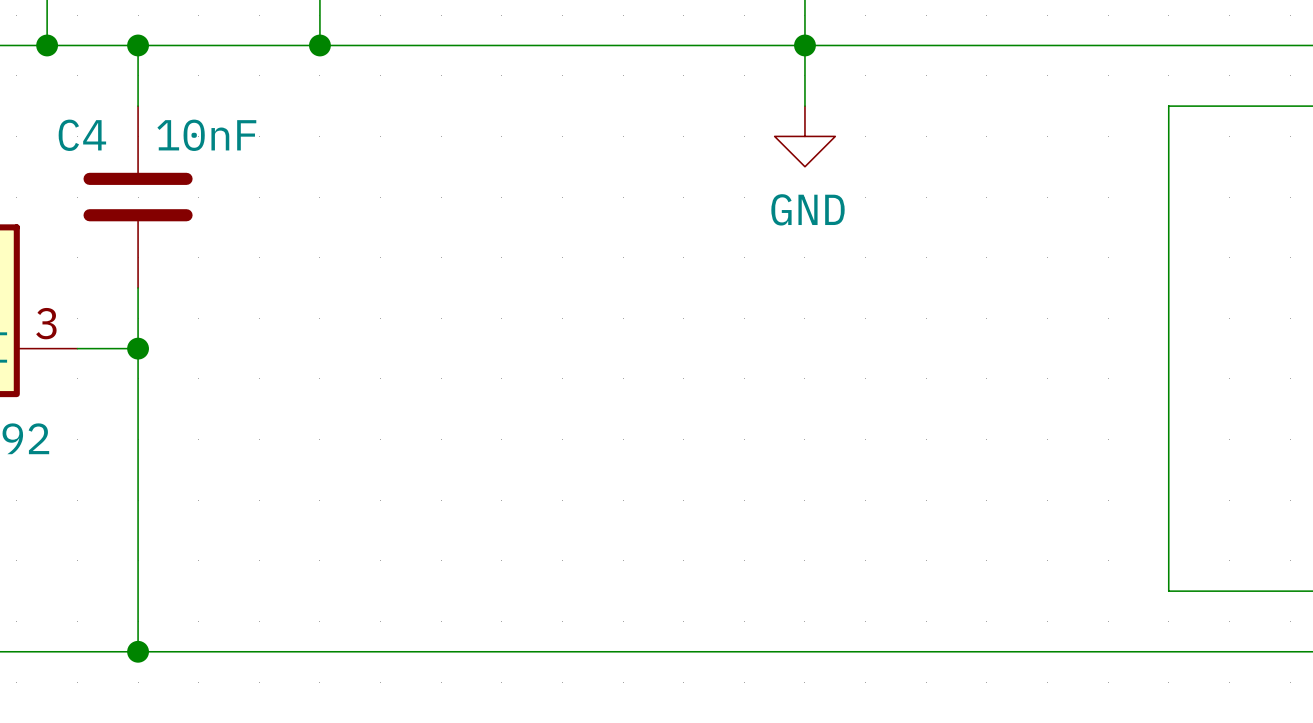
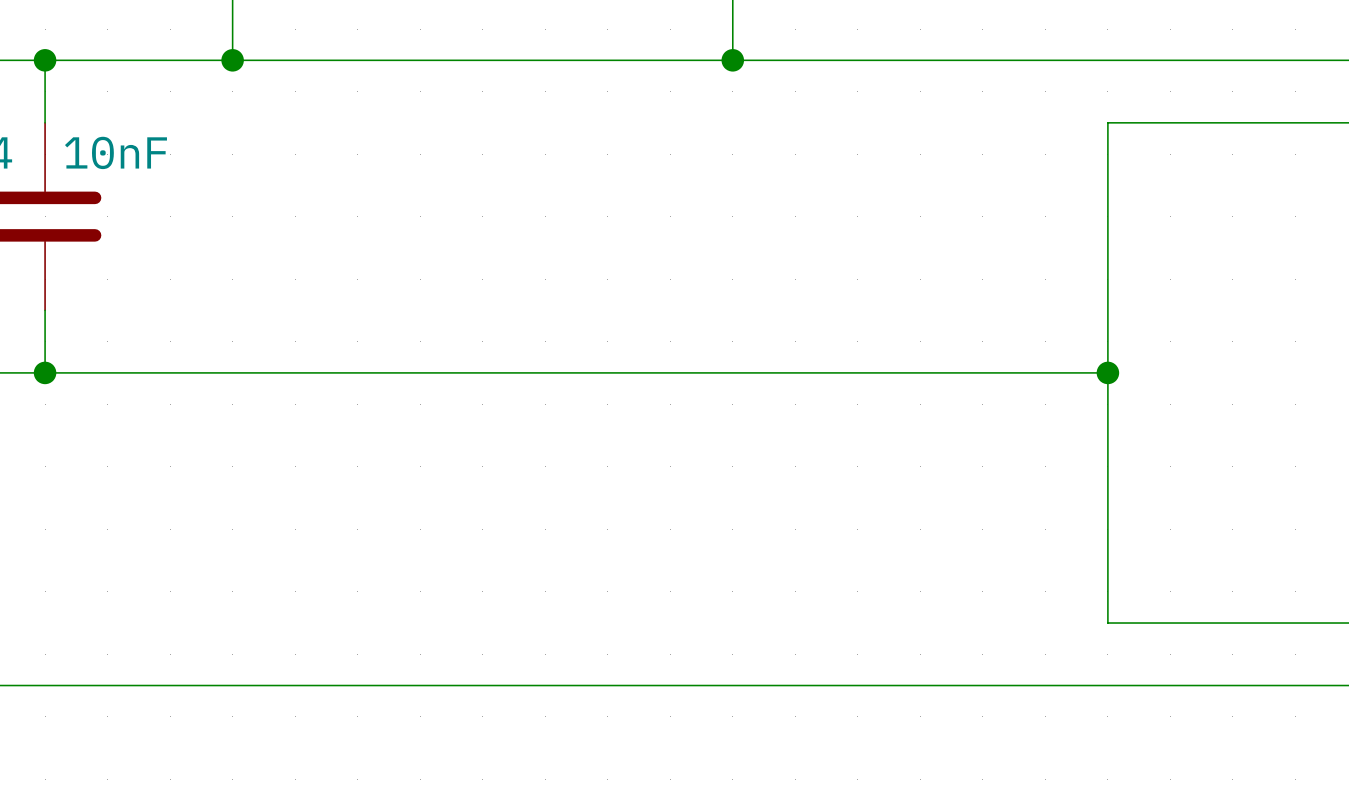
wire: (804, 45) (804, 106) -> none
power symbol: GND (804, 136) -> none
wire: (138, 348) (138, 651) -> (45, 372) (1107, 372)
junction: none -> (1107, 372)
junction: (138, 651) -> none

